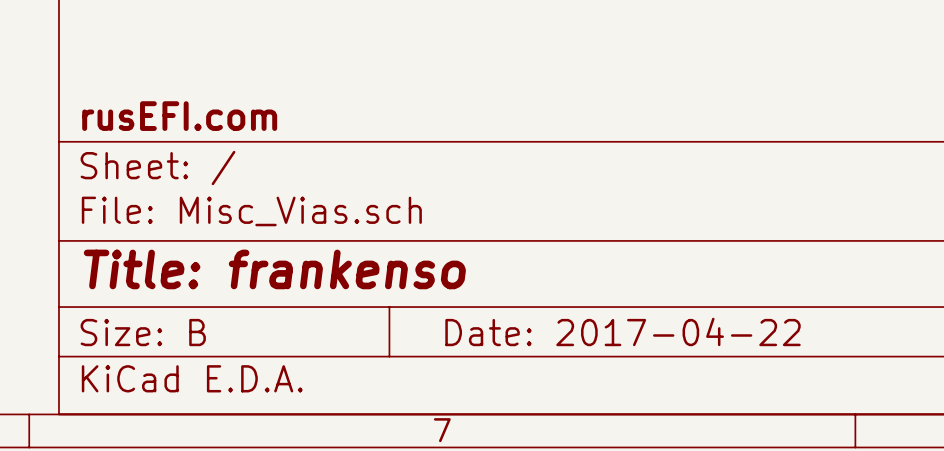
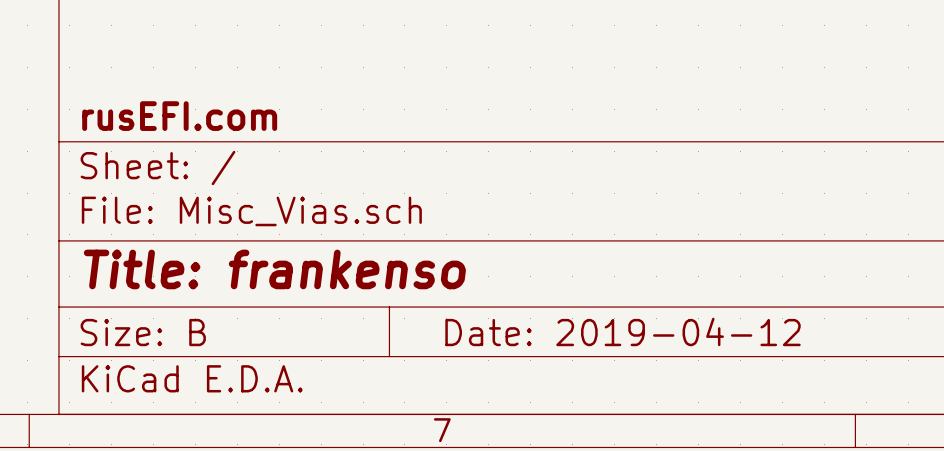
title block: Date: 2017-04-22 (623, 331) -> Date: 2019-04-12 (623, 331)

